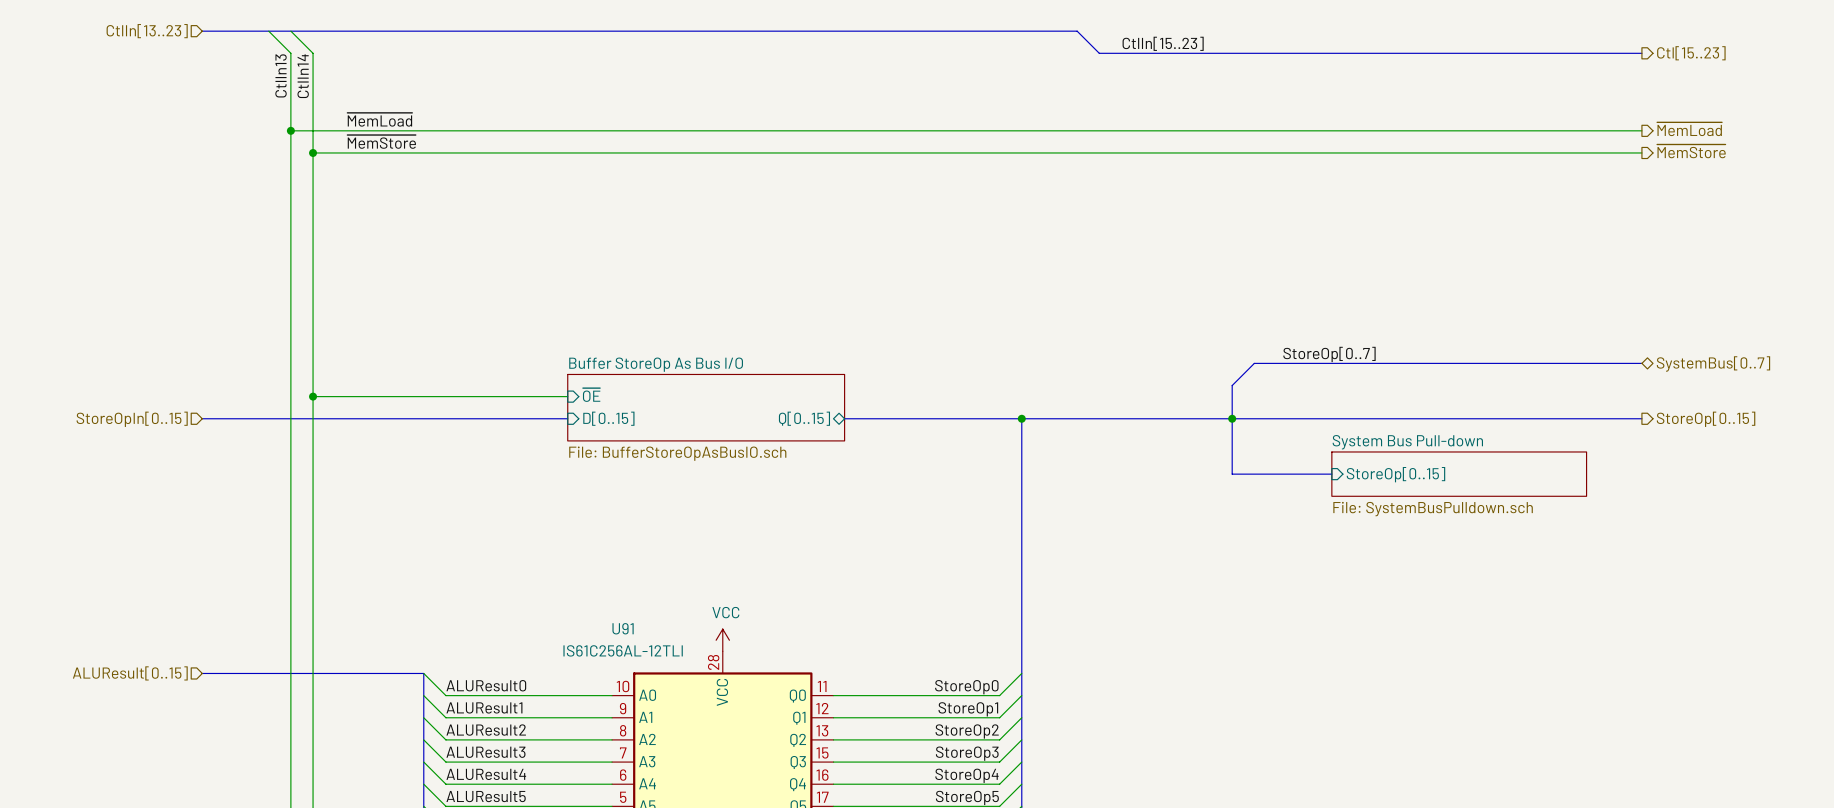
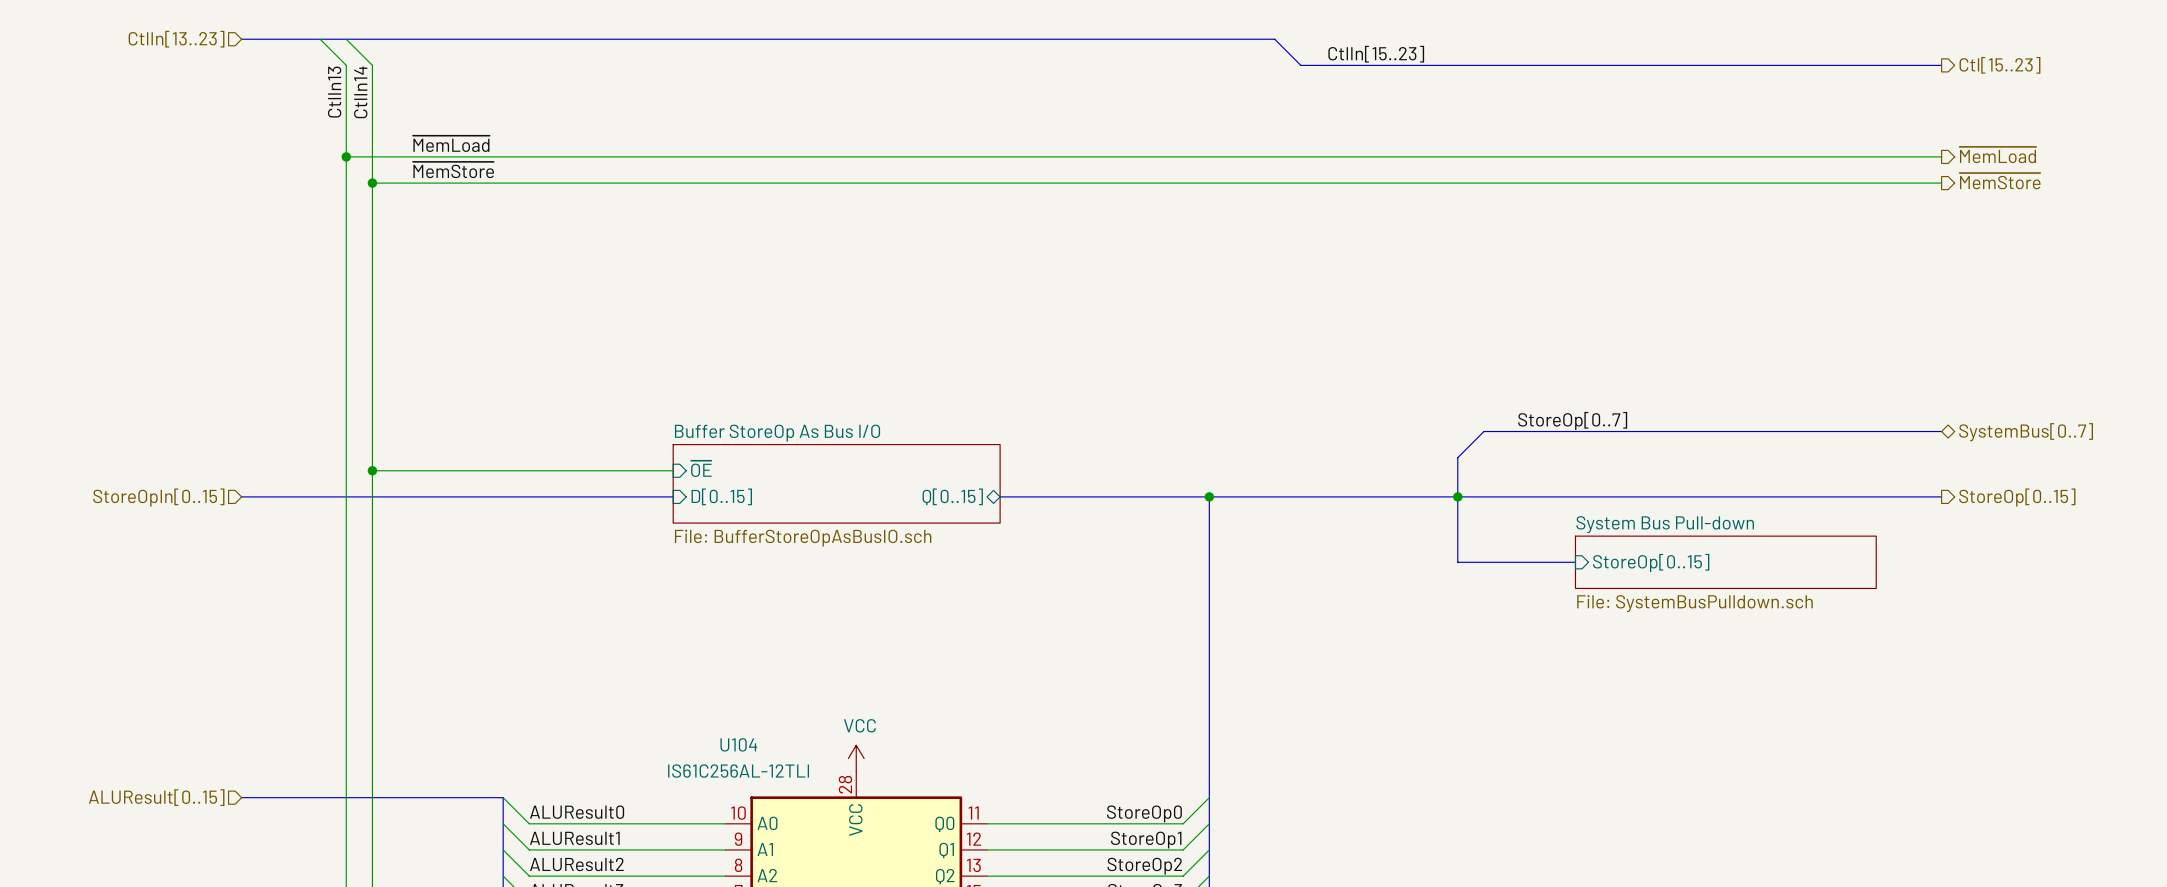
U91 name: U91 (623, 628) -> U104 (738, 744)

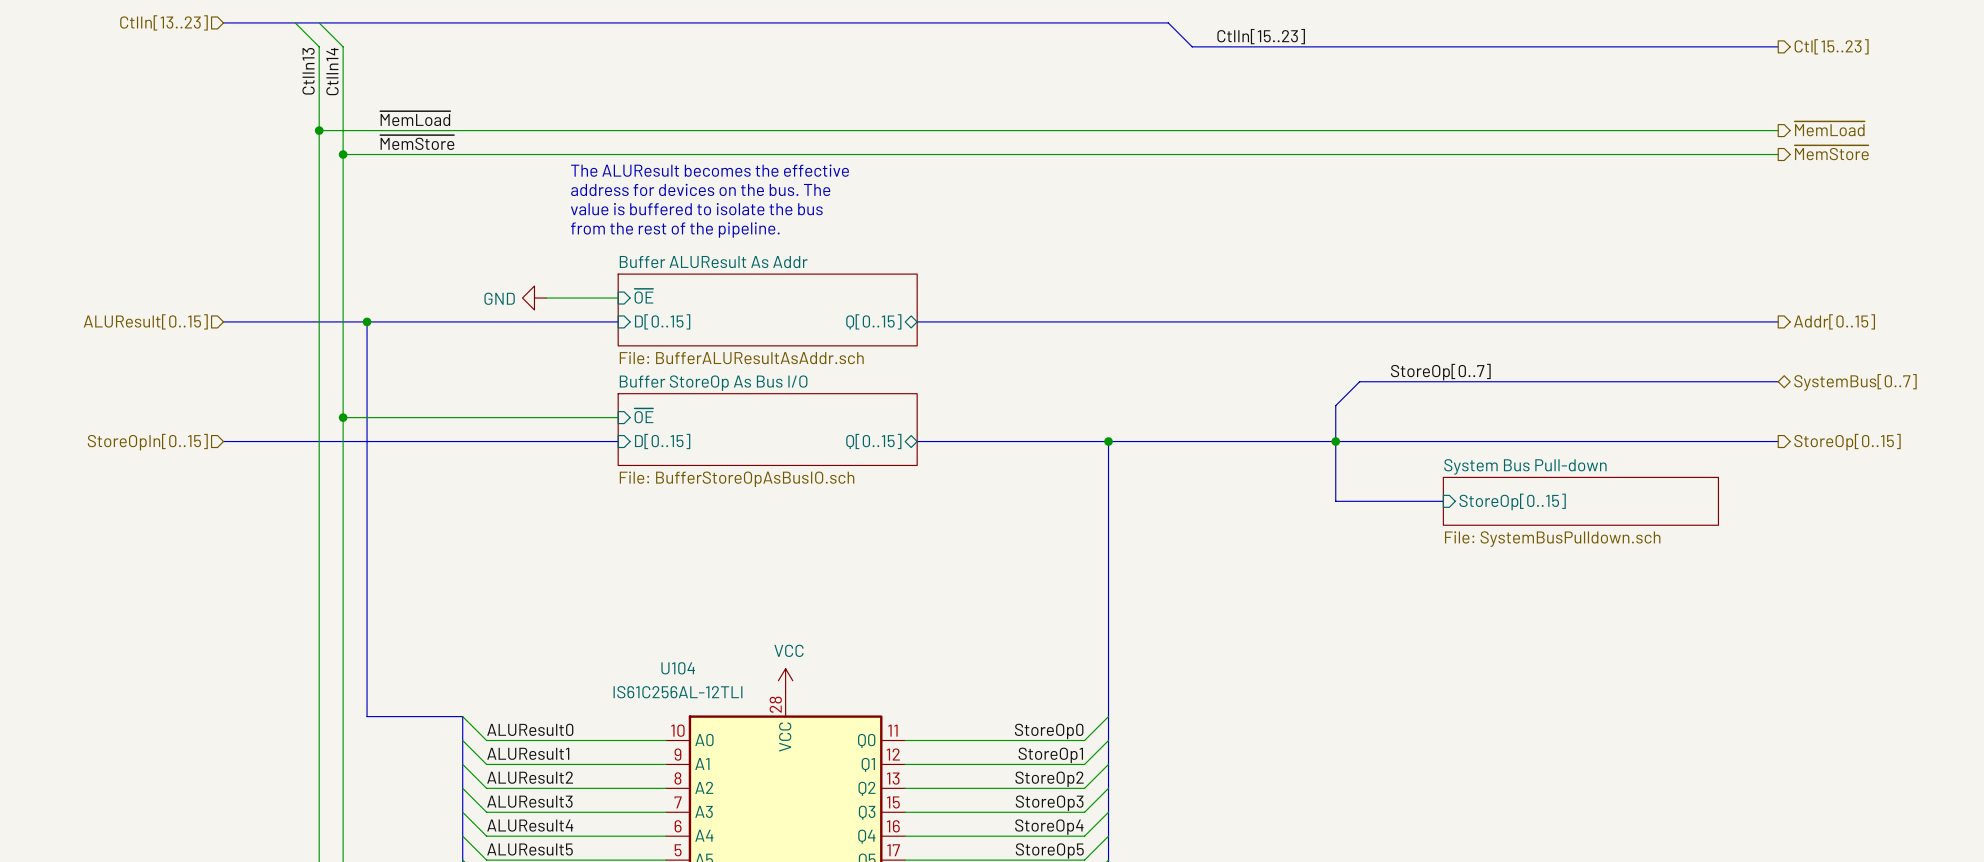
text: none -> The ALUResult becomes the effective (709, 170)
text: none -> address for devices on the bus. The (700, 189)
text: none -> value is buffered to isolate the bus (696, 209)
text: none -> from the rest of the pipeline. (675, 229)
sheet pin: none -> ~{OE} (643, 296)
power symbol: none -> GND (534, 298)
wire: none -> (546, 298) (618, 298)
sheet Buffer ALUResult As Addr: none -> File: BufferALUResultAsAddr.sch (767, 309)
hierarchical label: none -> ALUResult[0..15] (145, 321)
bus: none -> (223, 321) (618, 321)
junction: none -> (367, 321)
sheet pin: none -> D[0..15] (662, 321)
sheet pin: none -> Q[0..15] (873, 321)
bus: none -> (917, 321) (1778, 321)
hierarchical label: none -> Addr[0..15] (1834, 321)
hierarchical label: ALUResult[0..15] (156, 797) -> none
bus: (241, 797) (398, 797) -> (367, 321) (367, 716)

